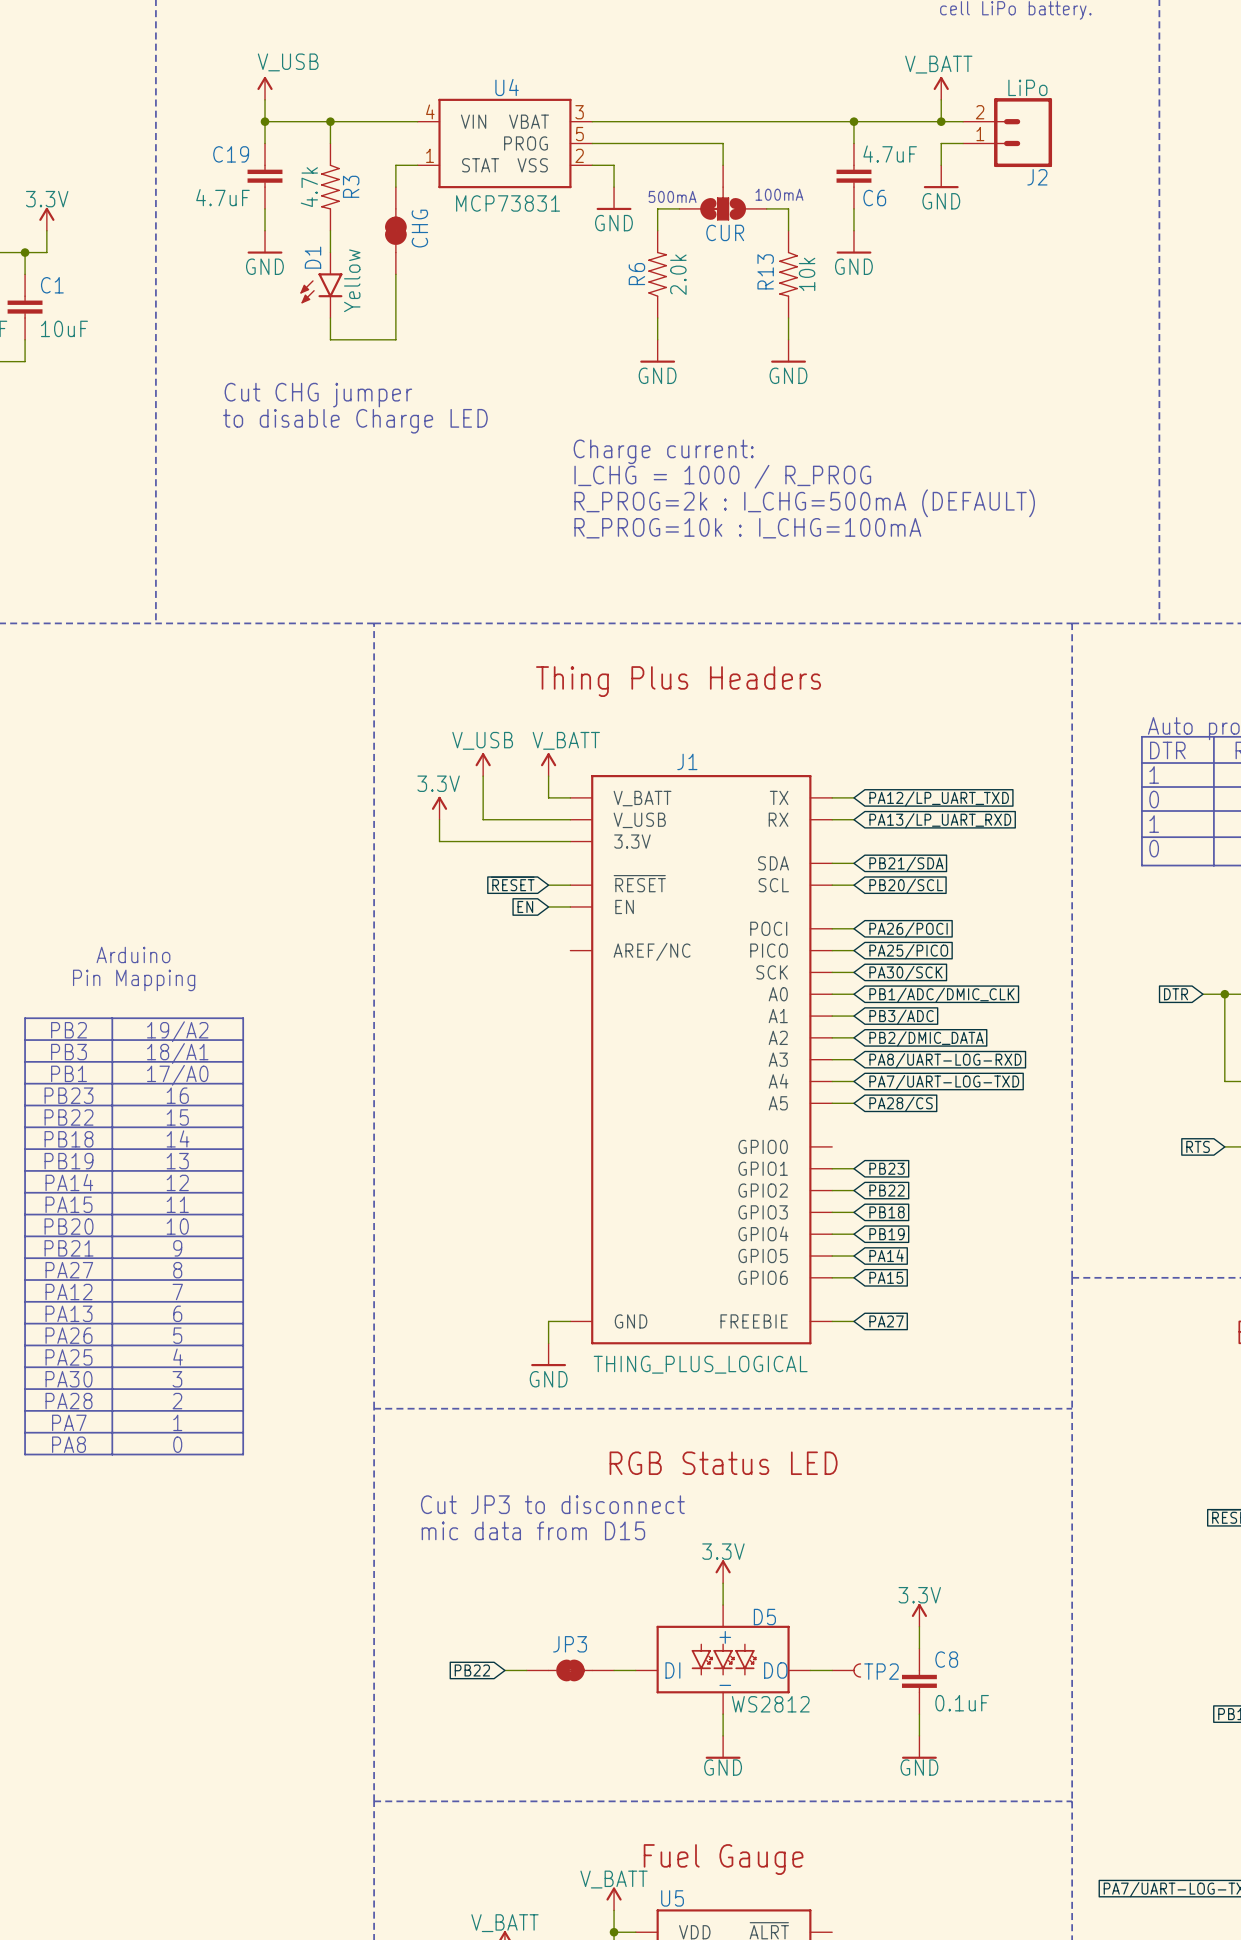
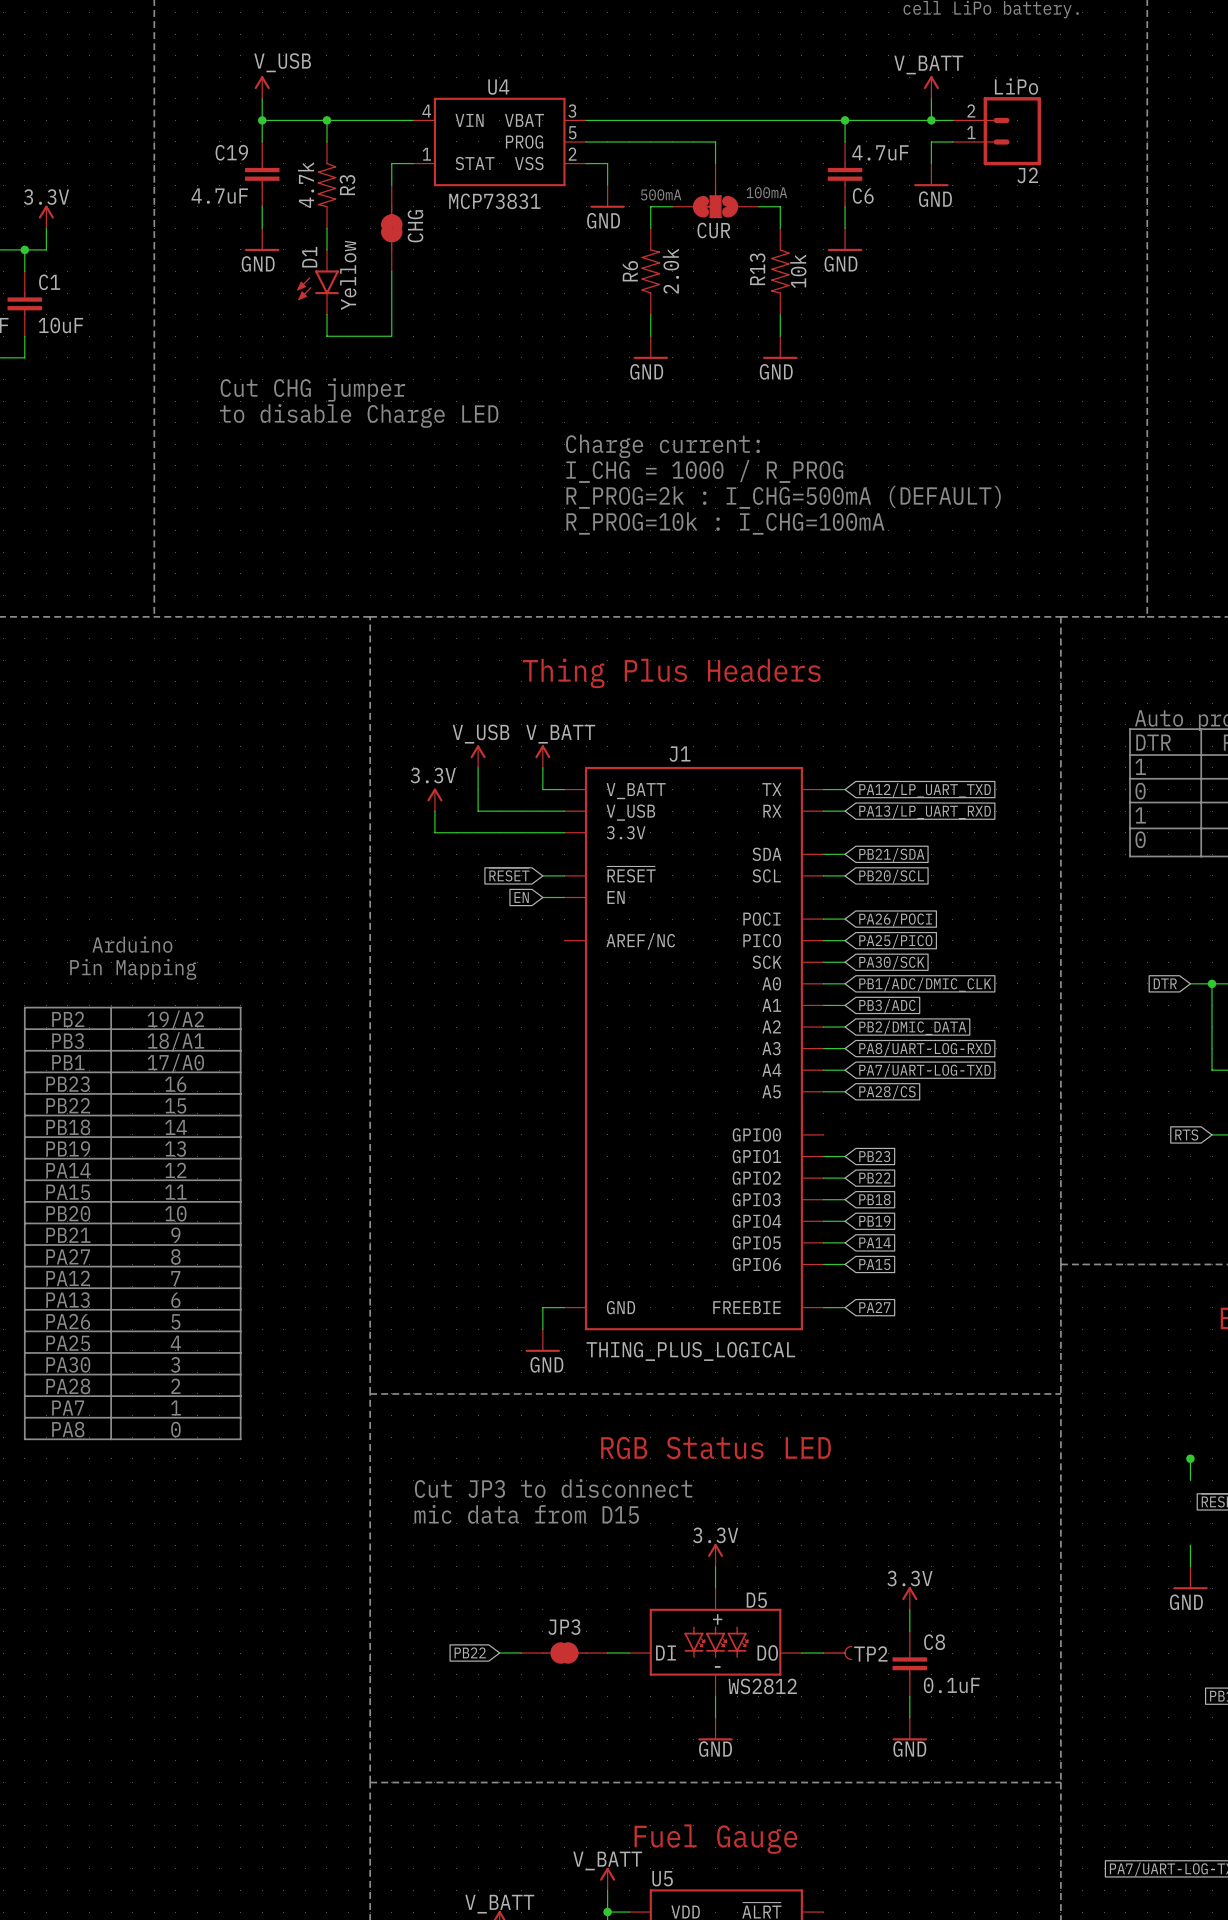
wire: none -> (1190, 1458) (1190, 1480)
junction: none -> (1190, 1458)
wire: none -> (1190, 1545) (1190, 1566)
power symbol: none -> GND (1190, 1577)

